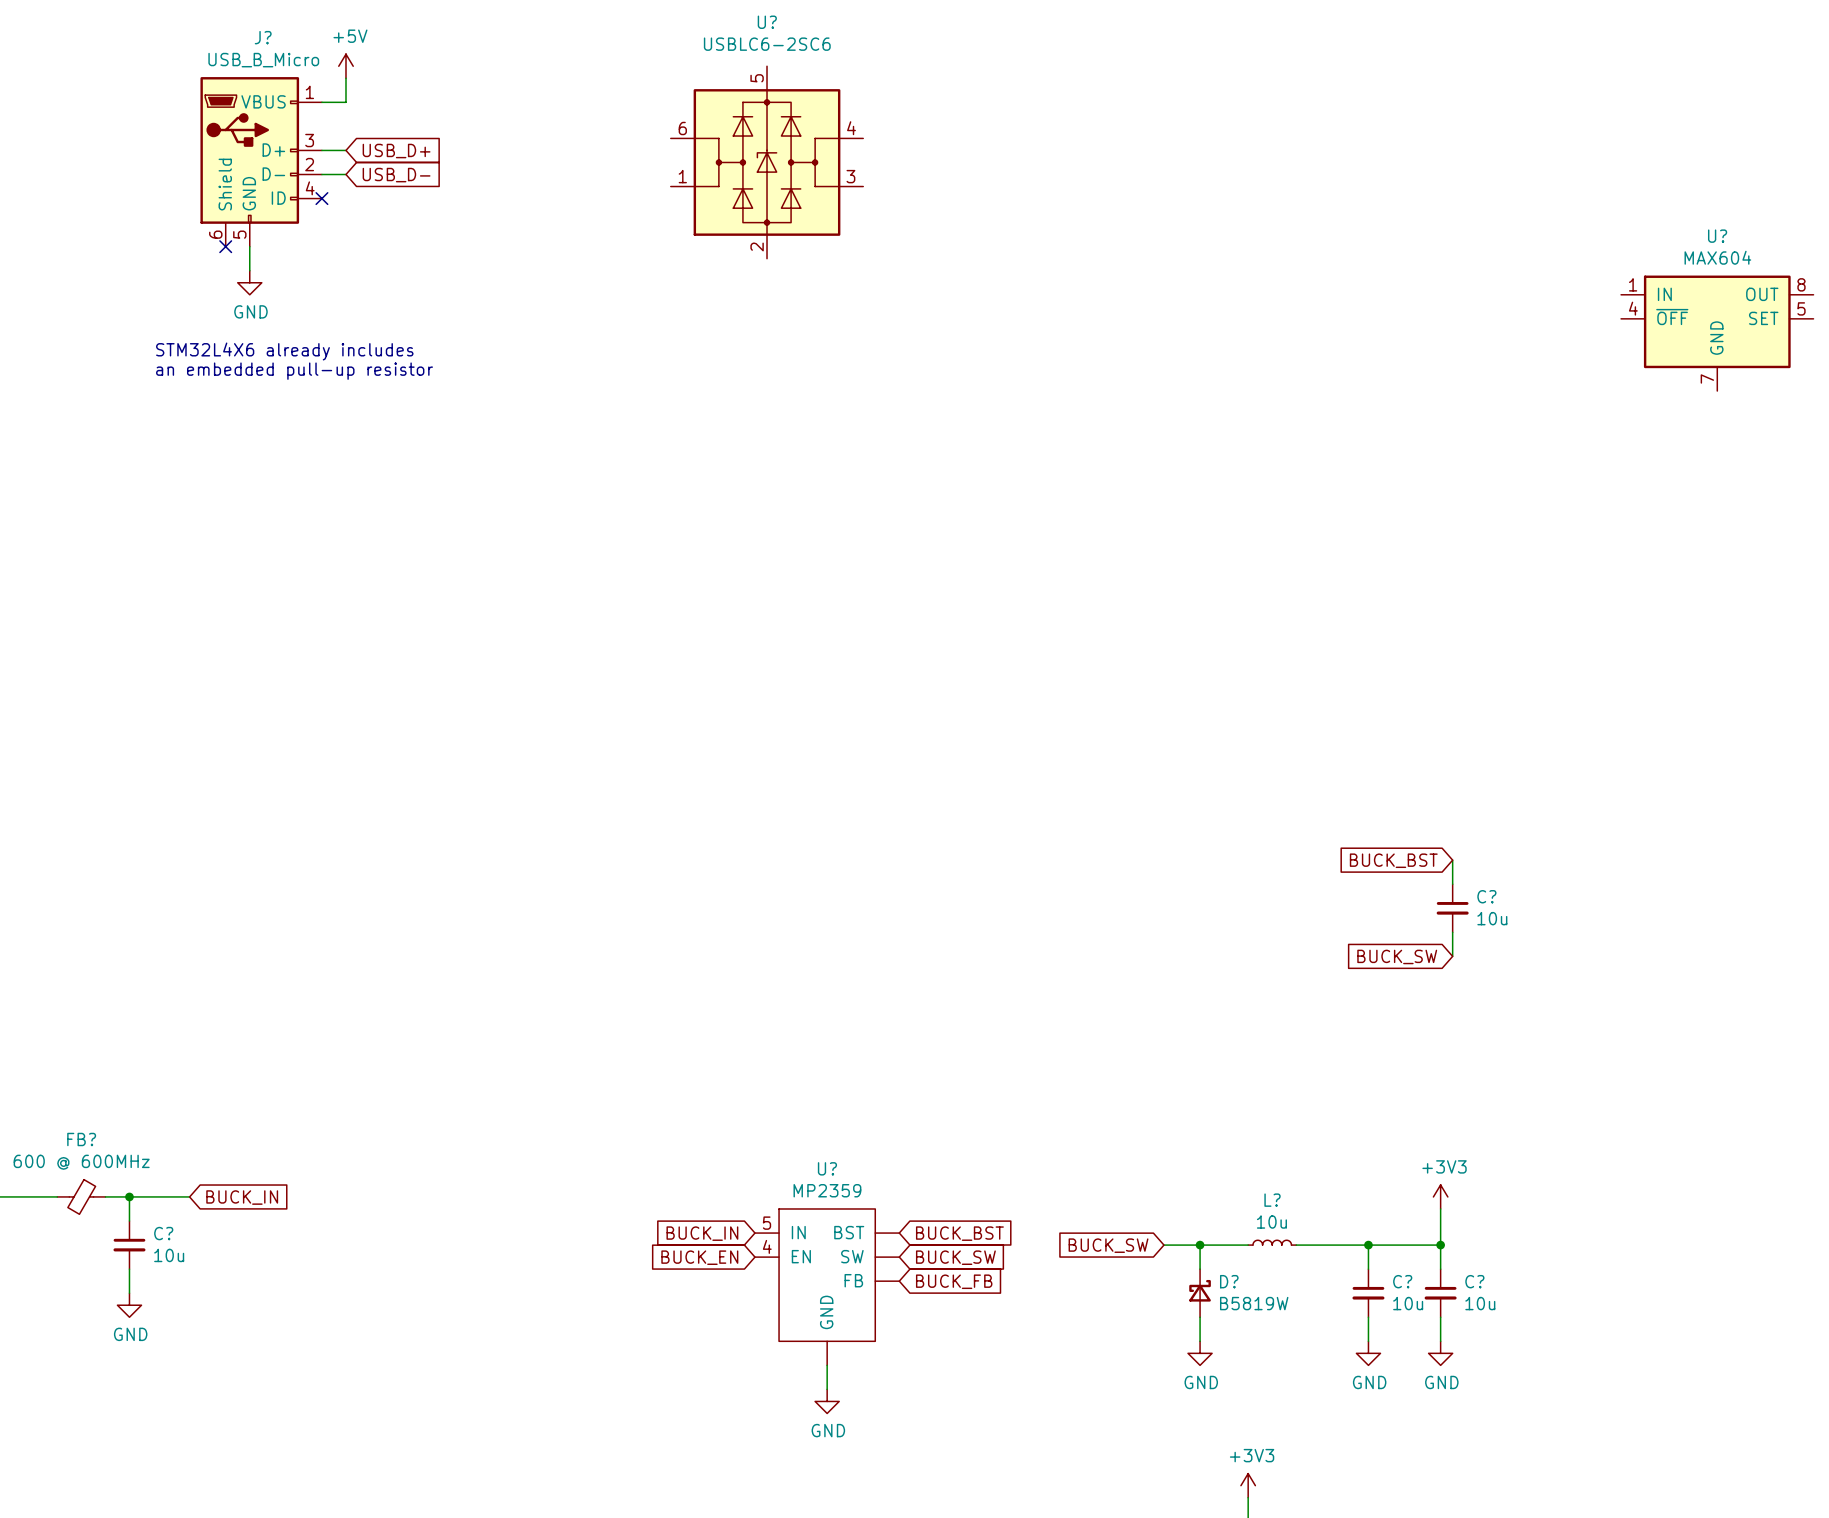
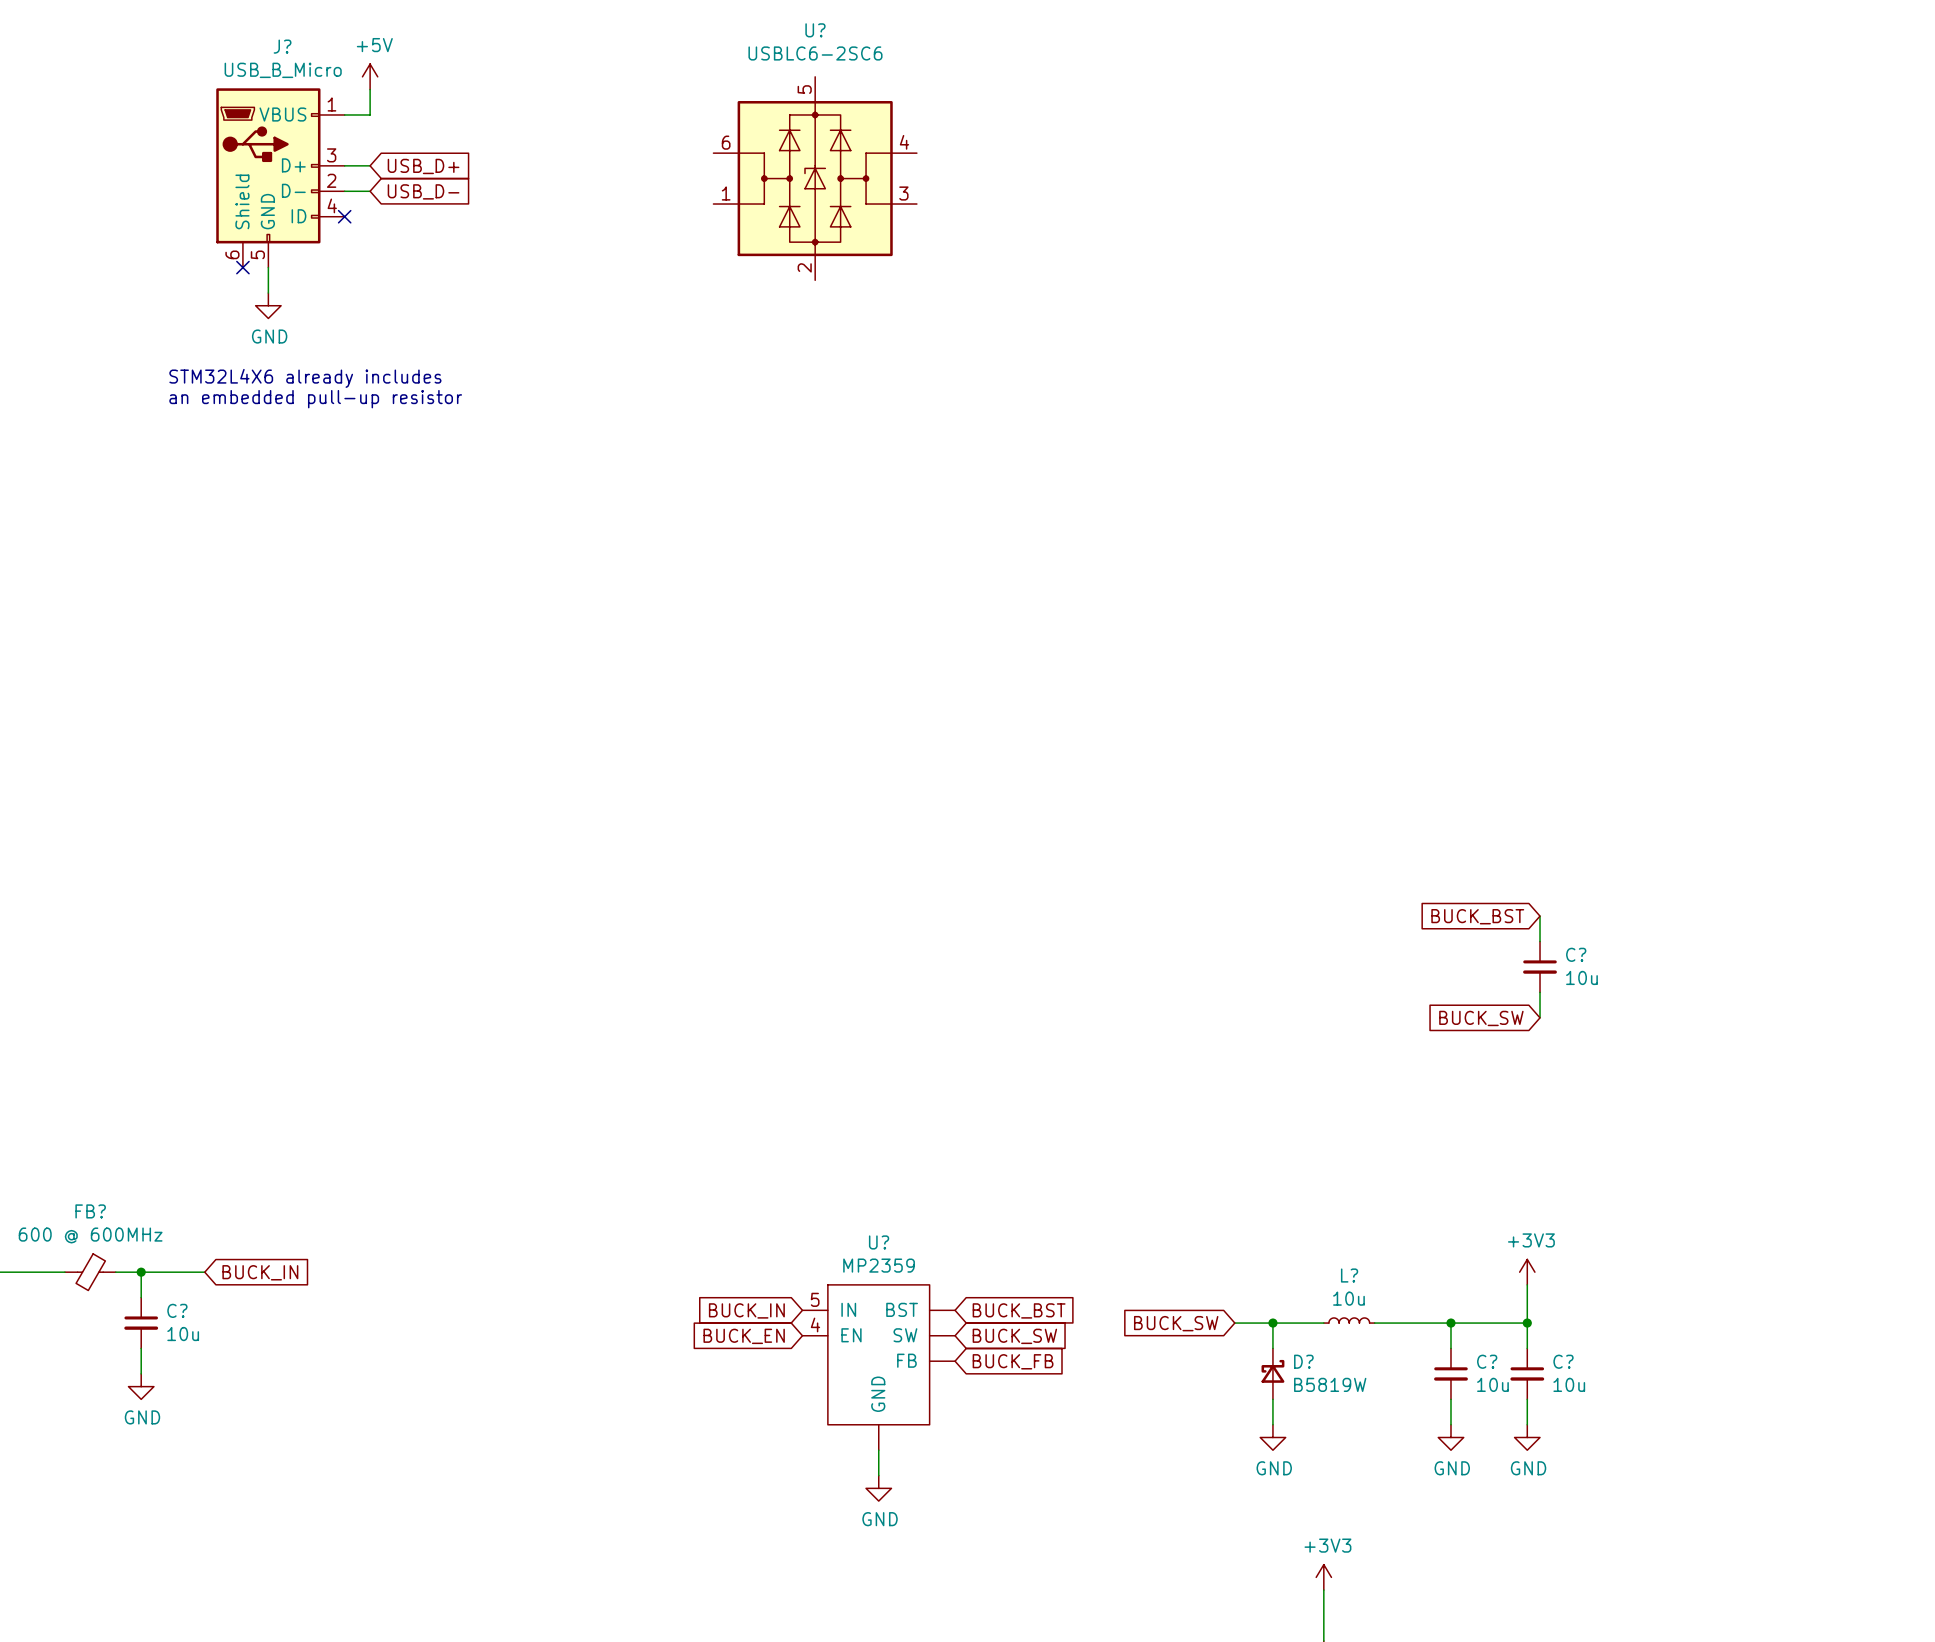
U?: MAX604 (1717, 333) -> none

